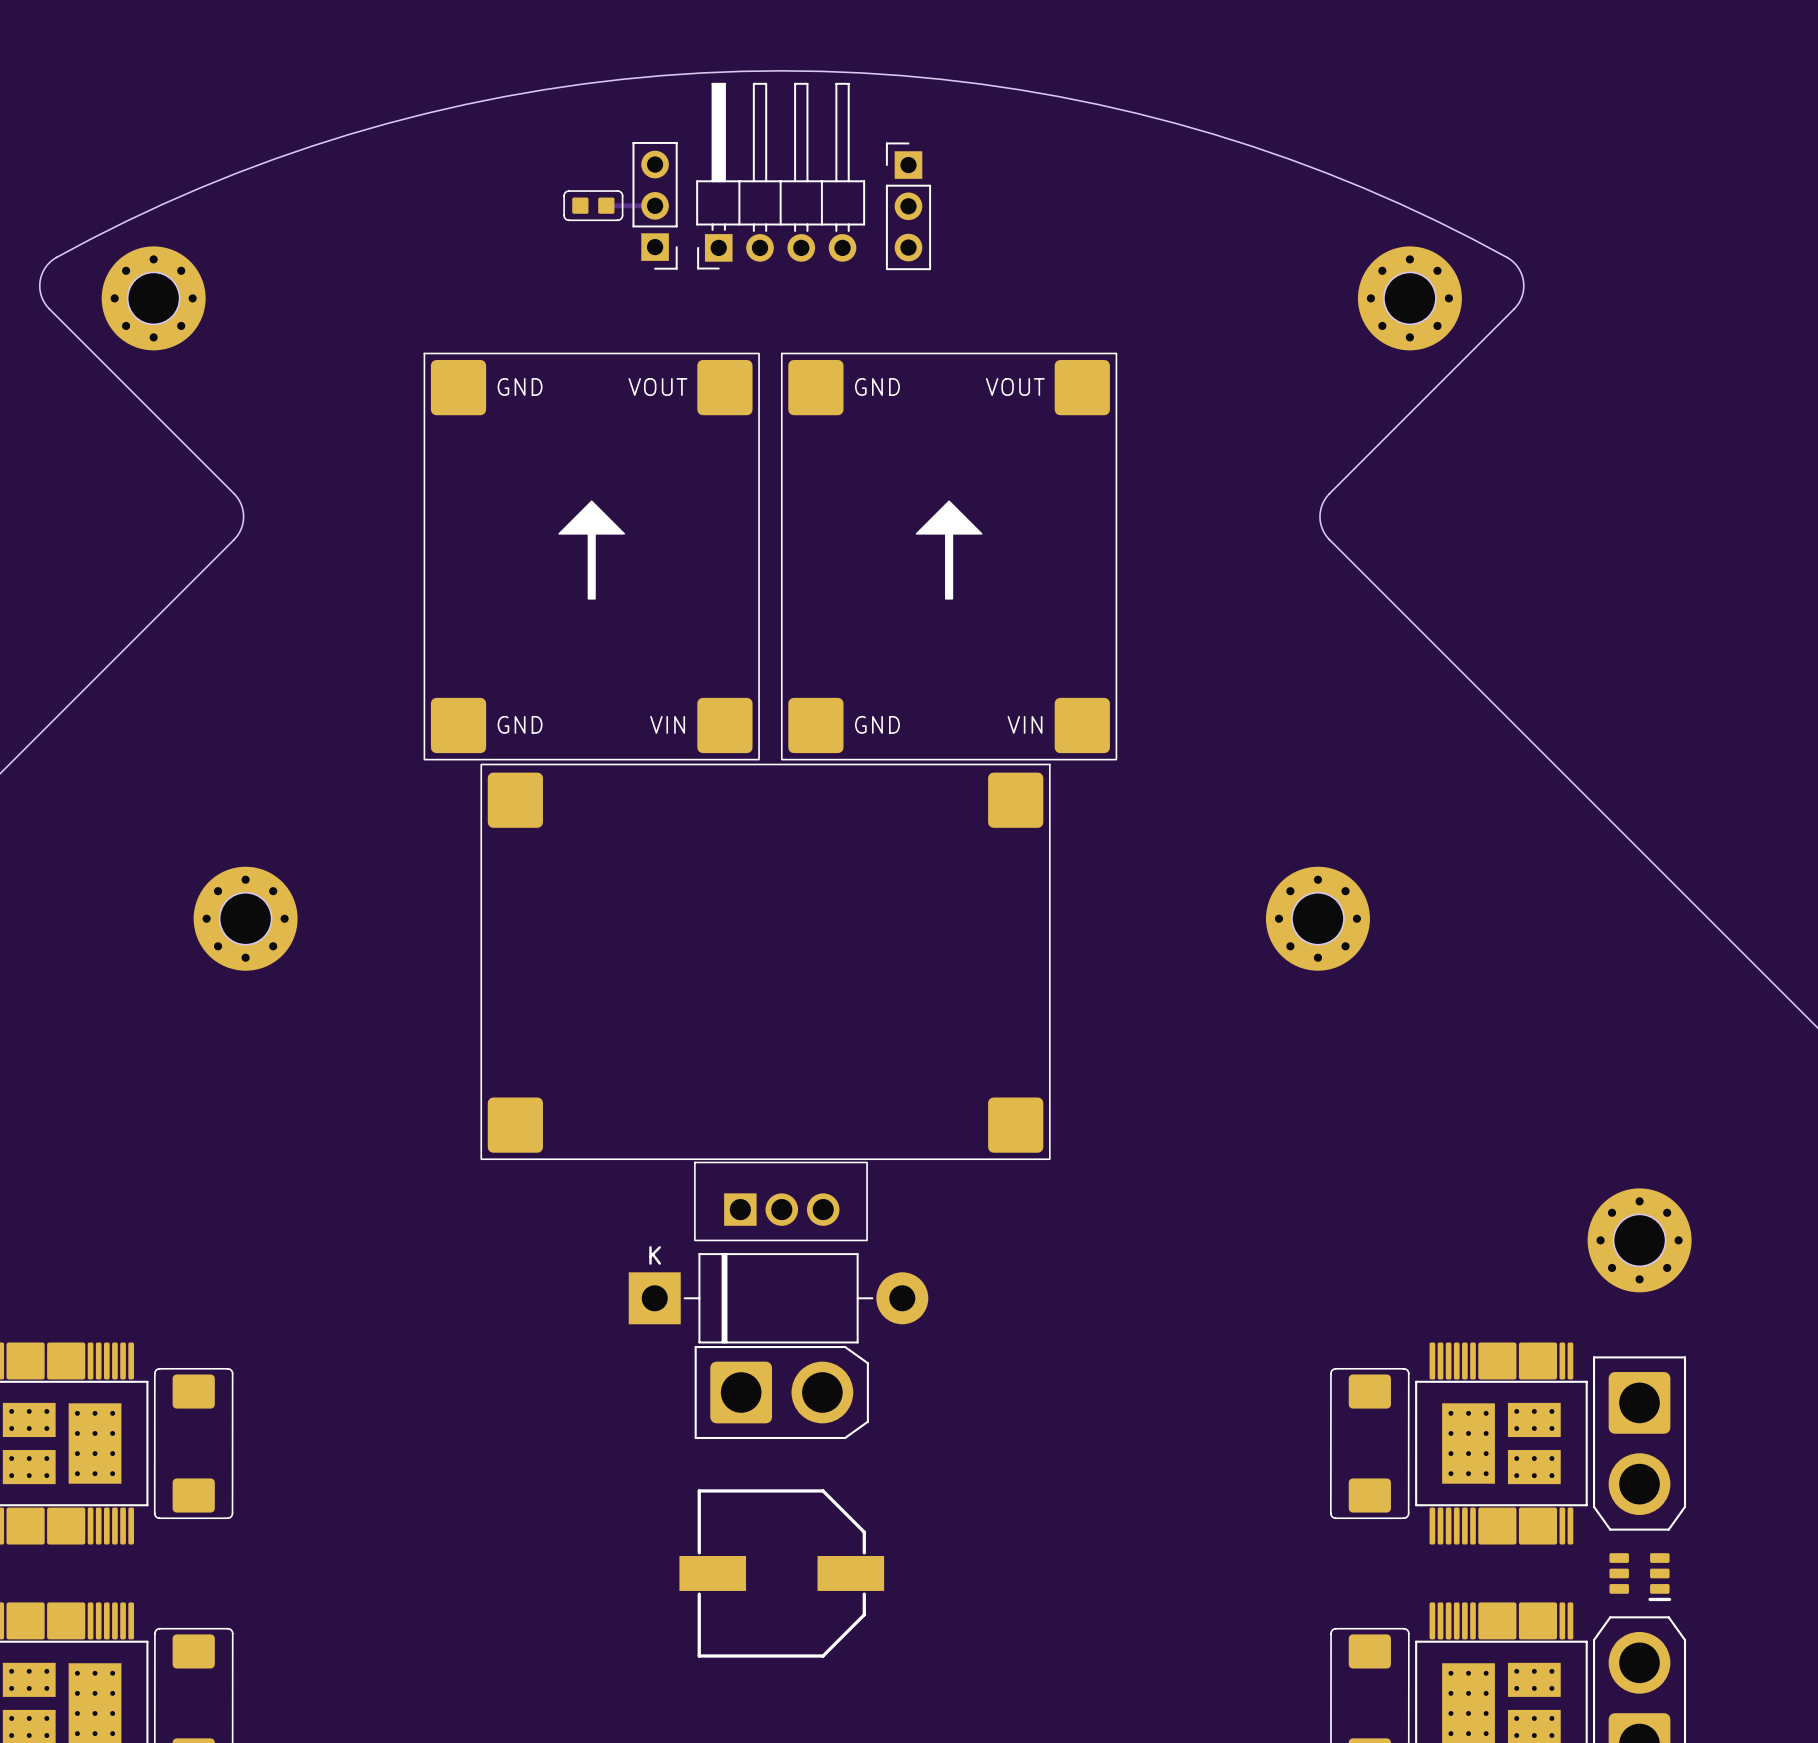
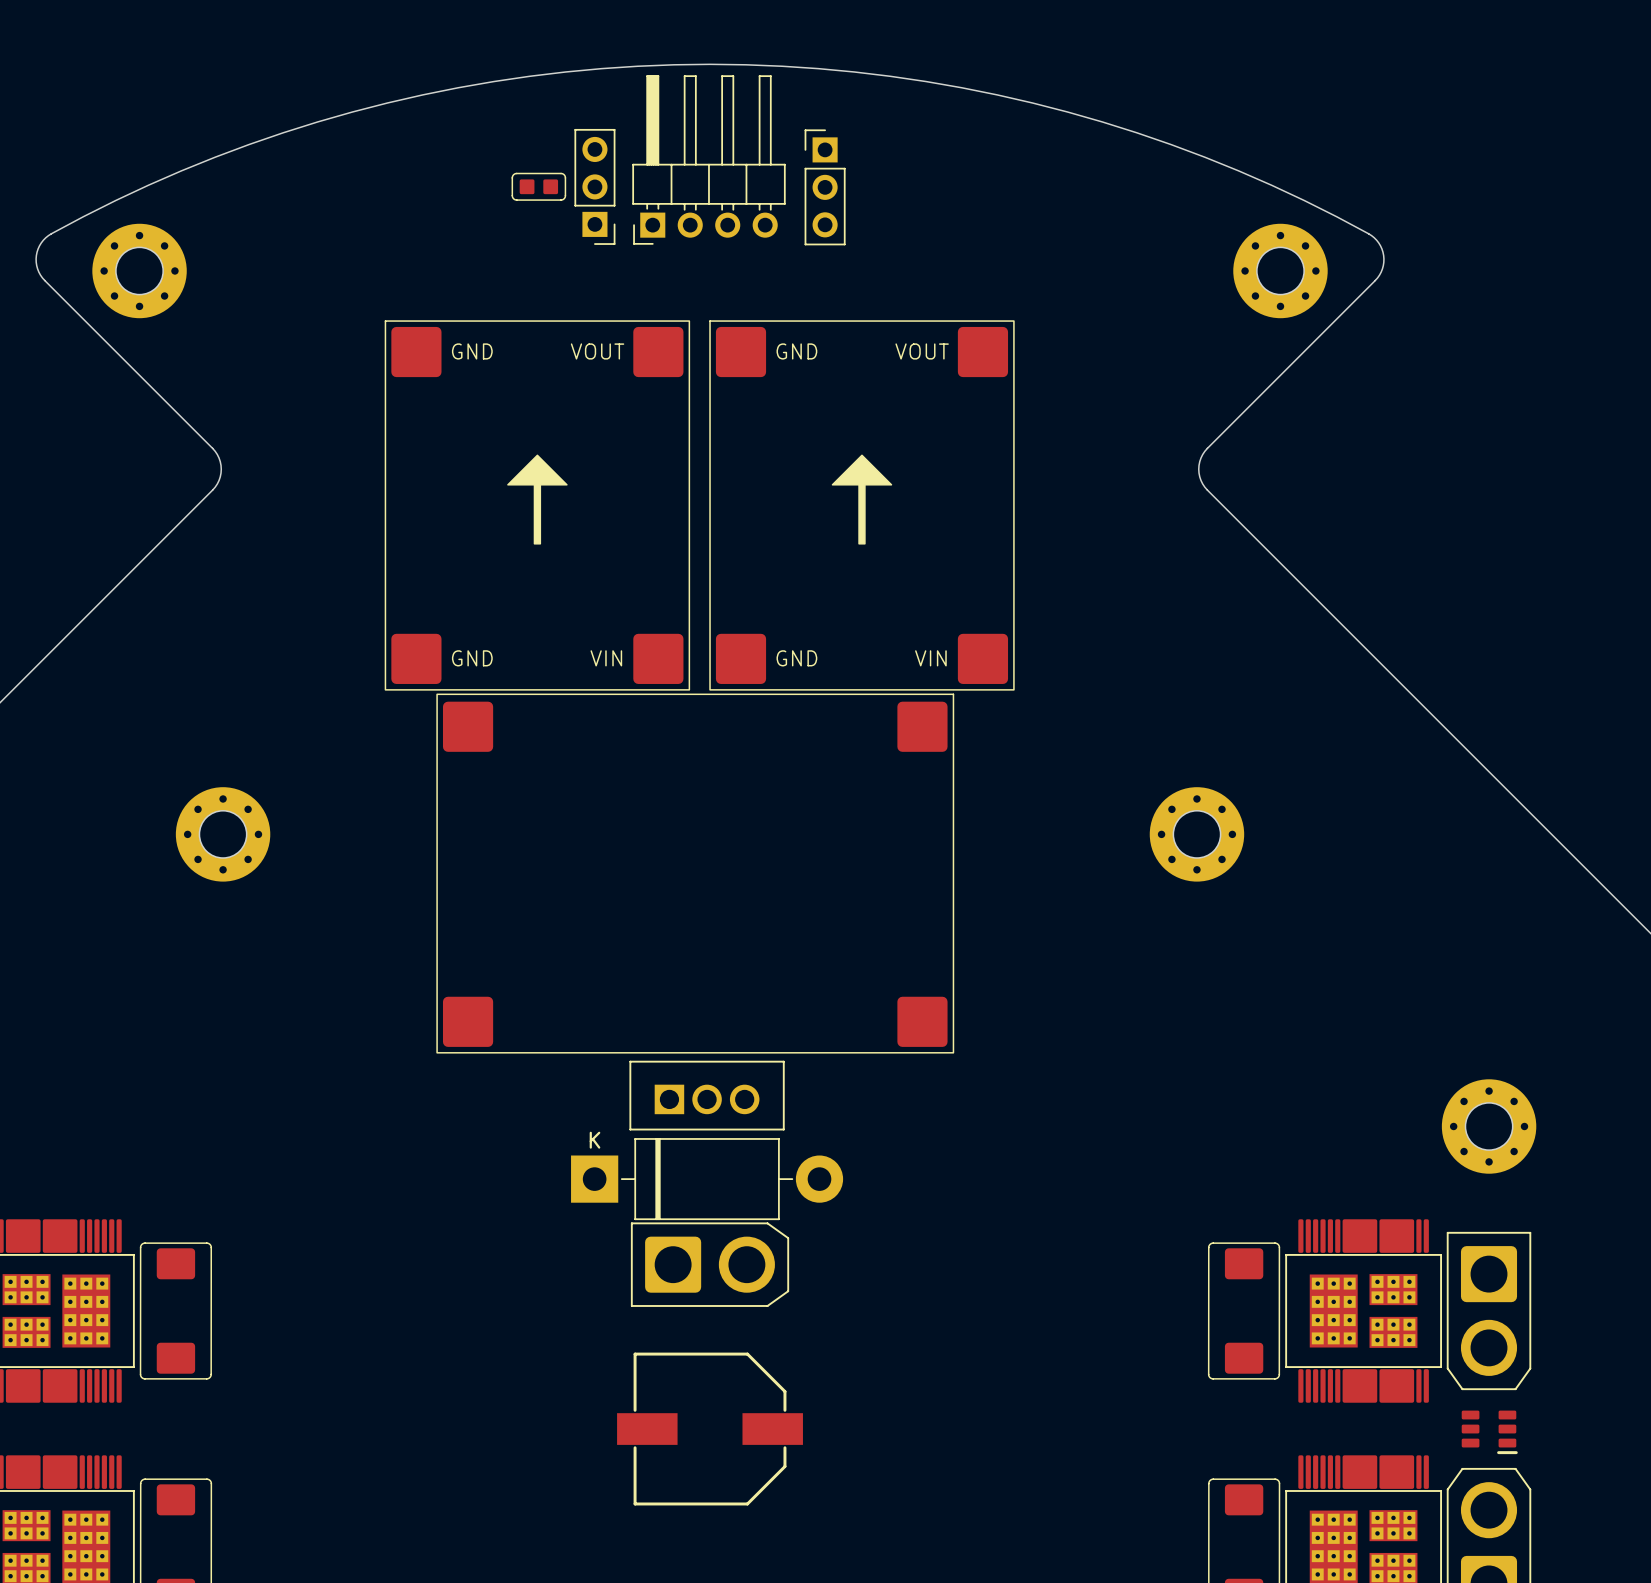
track: (606, 205) (655, 205) -> none
part footprint: [694, 1161, 868, 1242] -> [629, 1060, 785, 1131]

